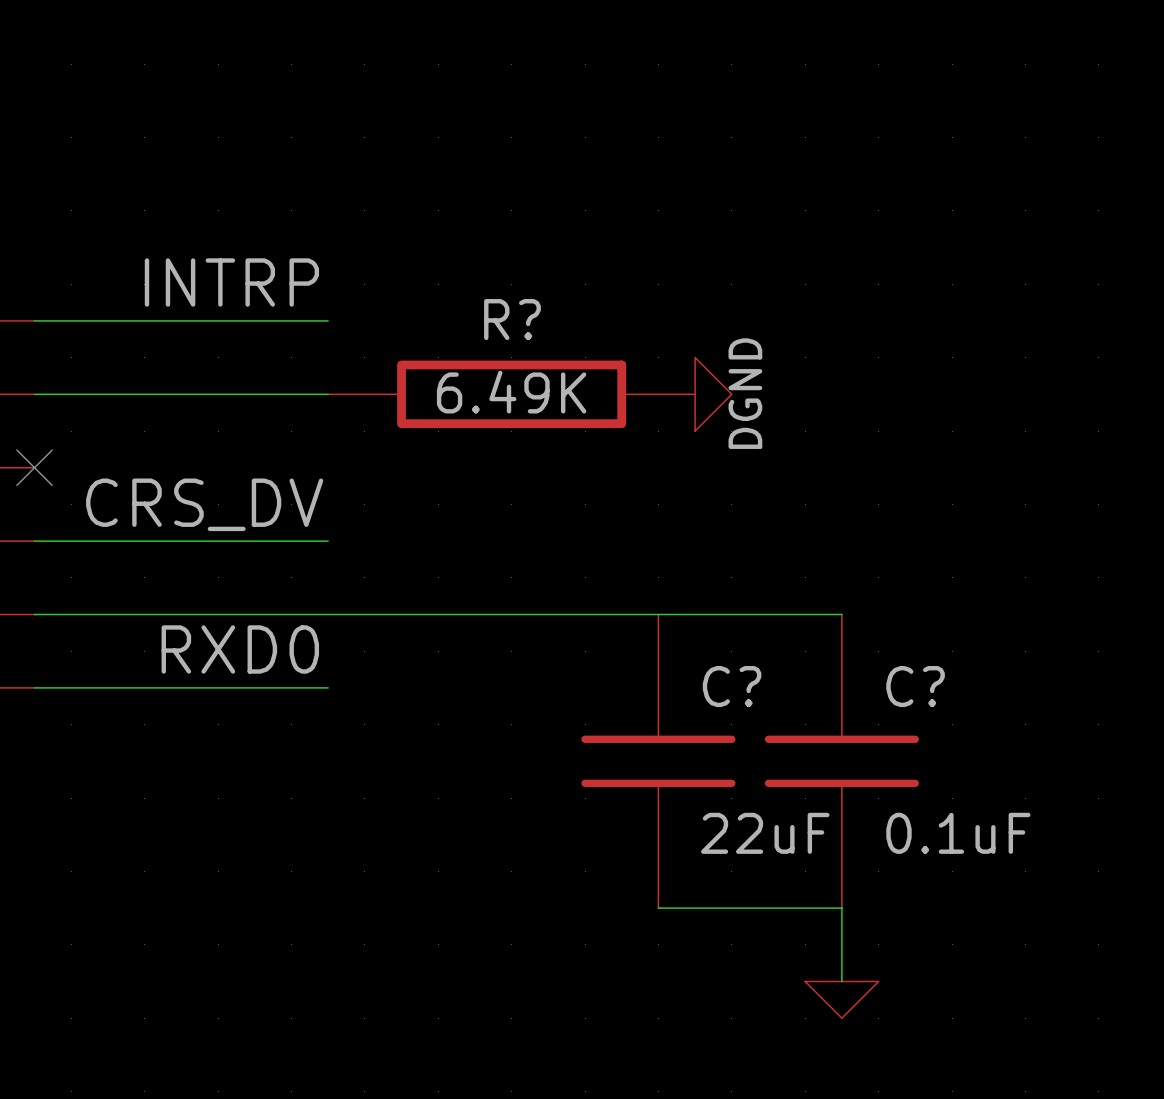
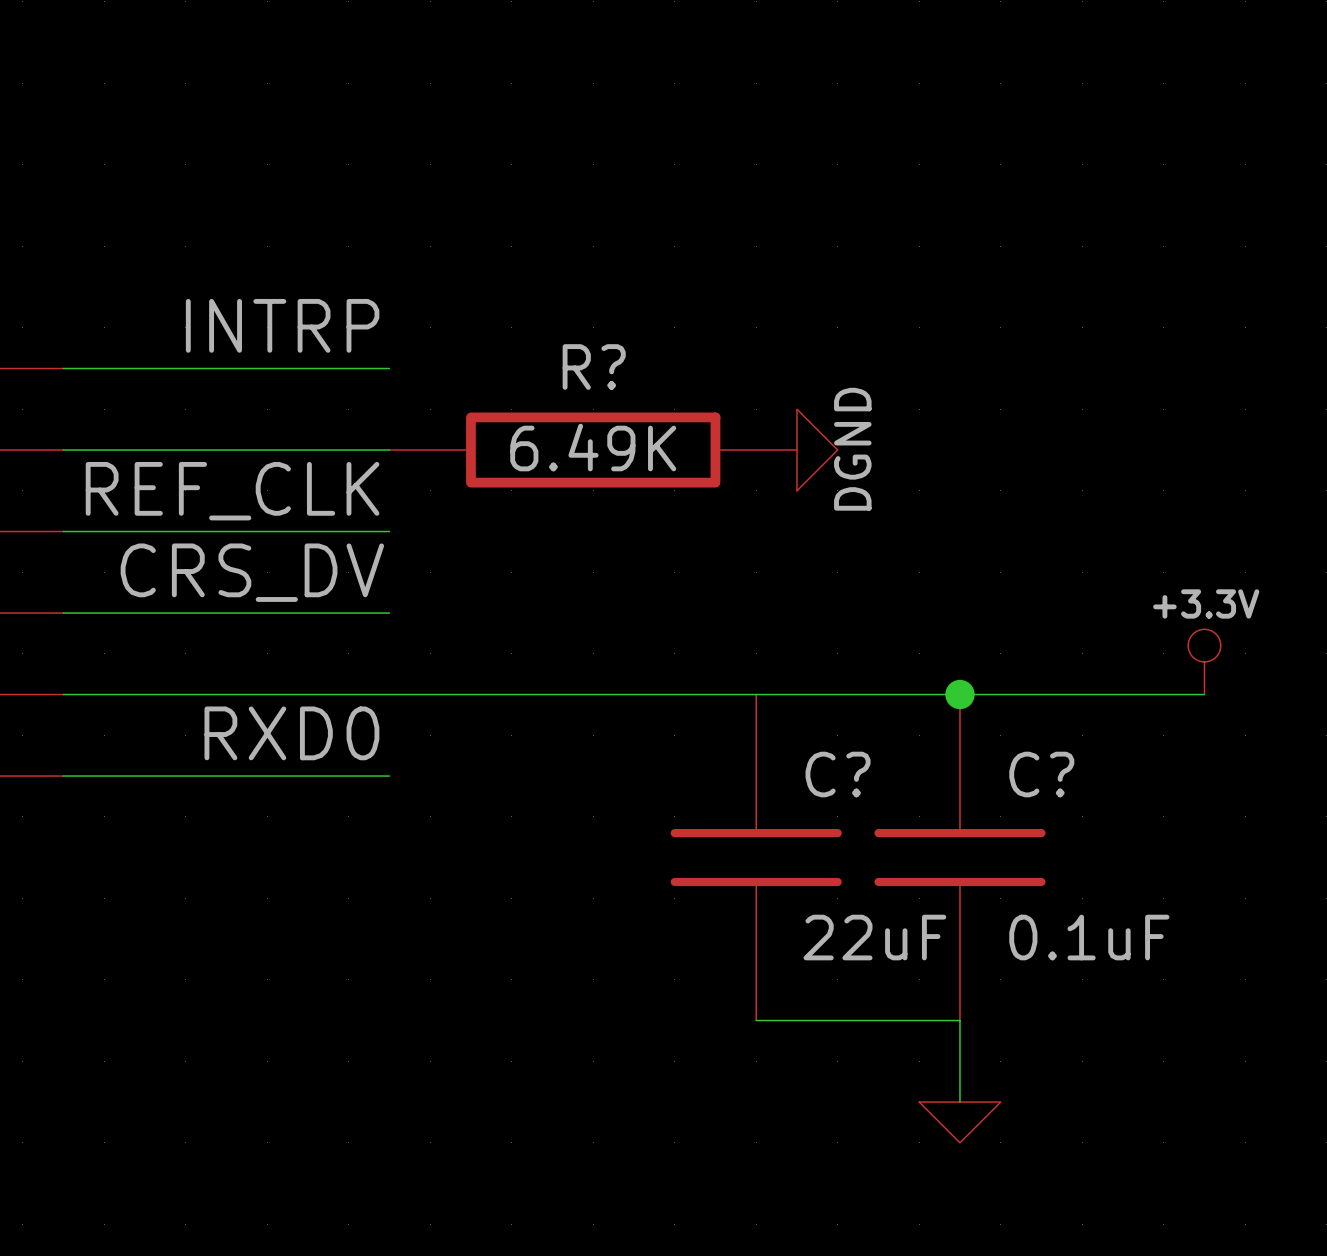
label: none -> REF_CLK (232, 491)
wire: none -> (63, 531) (389, 531)
no-connect mark: (34, 467) -> none
power symbol: none -> +3.3V (1204, 661)
wire: none -> (959, 694) (1204, 694)
junction: none -> (959, 694)

